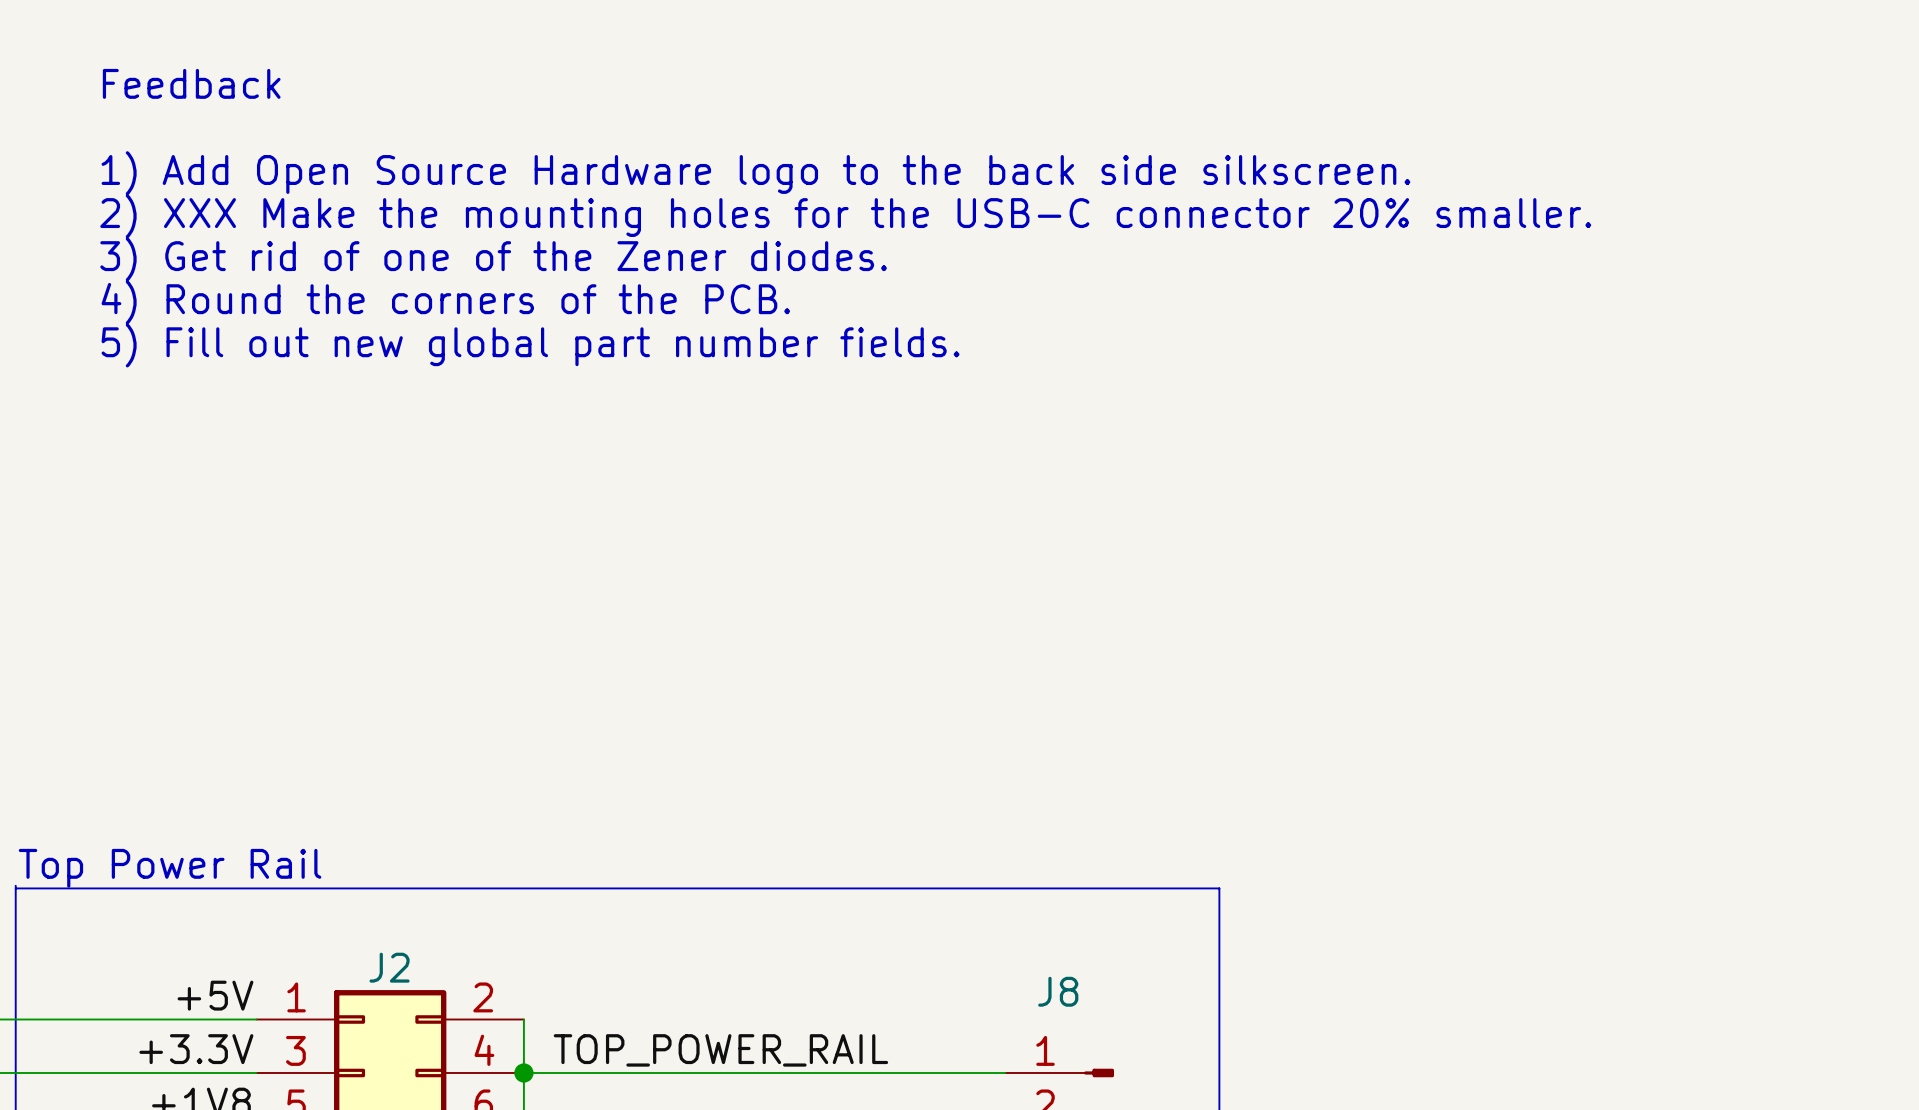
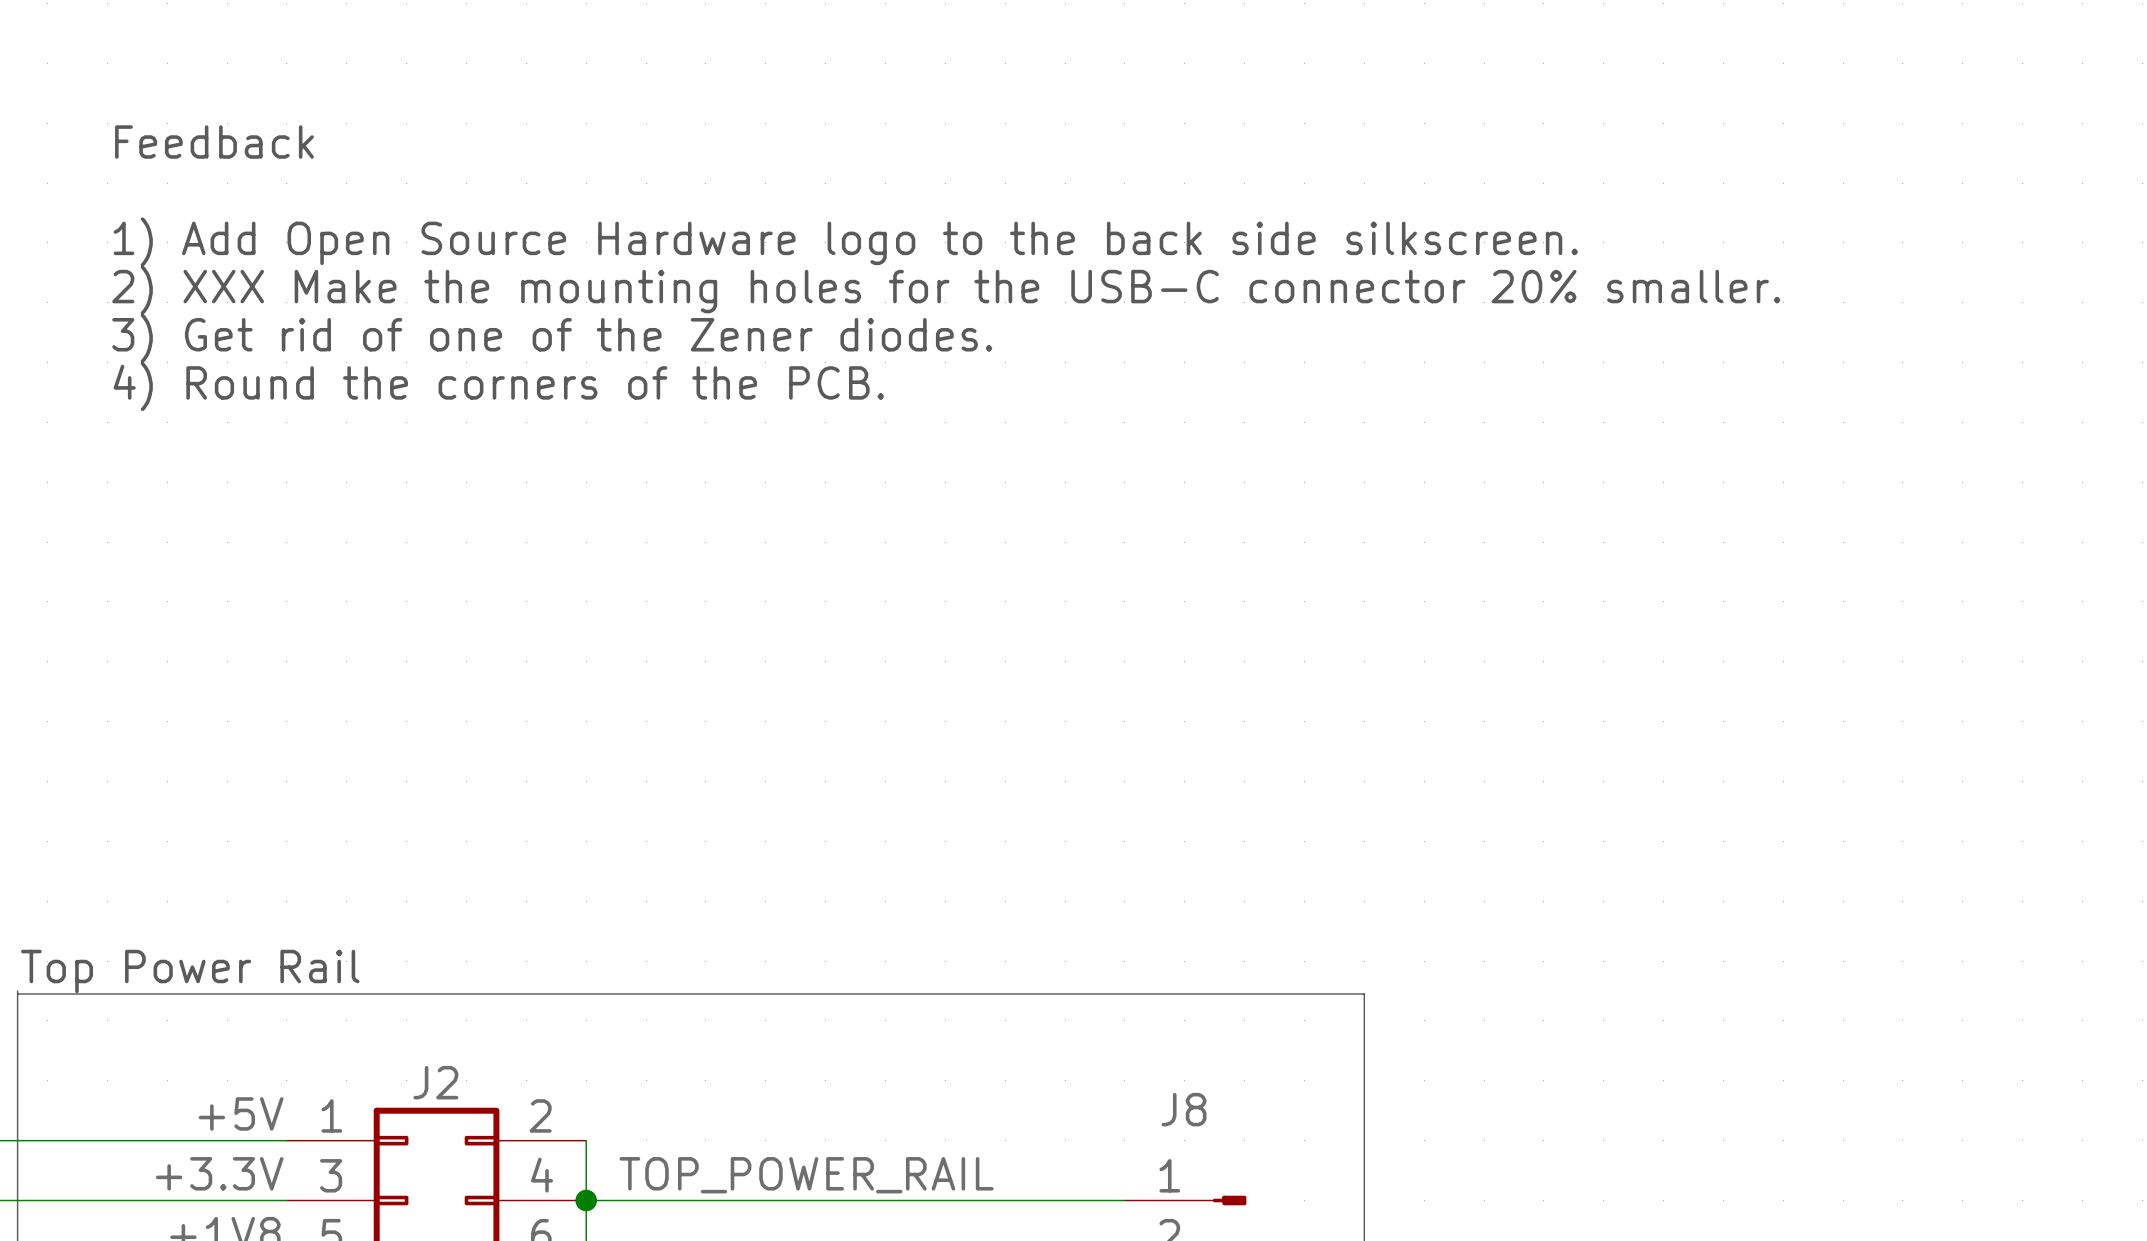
text position: Feedback (191, 83) -> Feedback (214, 142)
text: 1) Add Open Source Hardware logo to the back side silkscreen. (755, 173) -> none
text: 2) XXX Make the mounting holes for the USB-C connector 20% smaller. (845, 216) -> 1) Add Open Source Hardware logo to the back side silkscreen. (845, 241)
text: 3) Get rid of one of the Zener diodes. (493, 259) -> 2) XXX Make the mounting holes for the USB-C connector 20% smaller. (946, 290)
text: 4) Round the corners of the PCB. (445, 302) -> 3) Get rid of one of the Zener diodes. (552, 338)
text: 5) Fill out new global part number fields. (530, 345) -> 4) Round the corners of the PCB. (498, 386)

